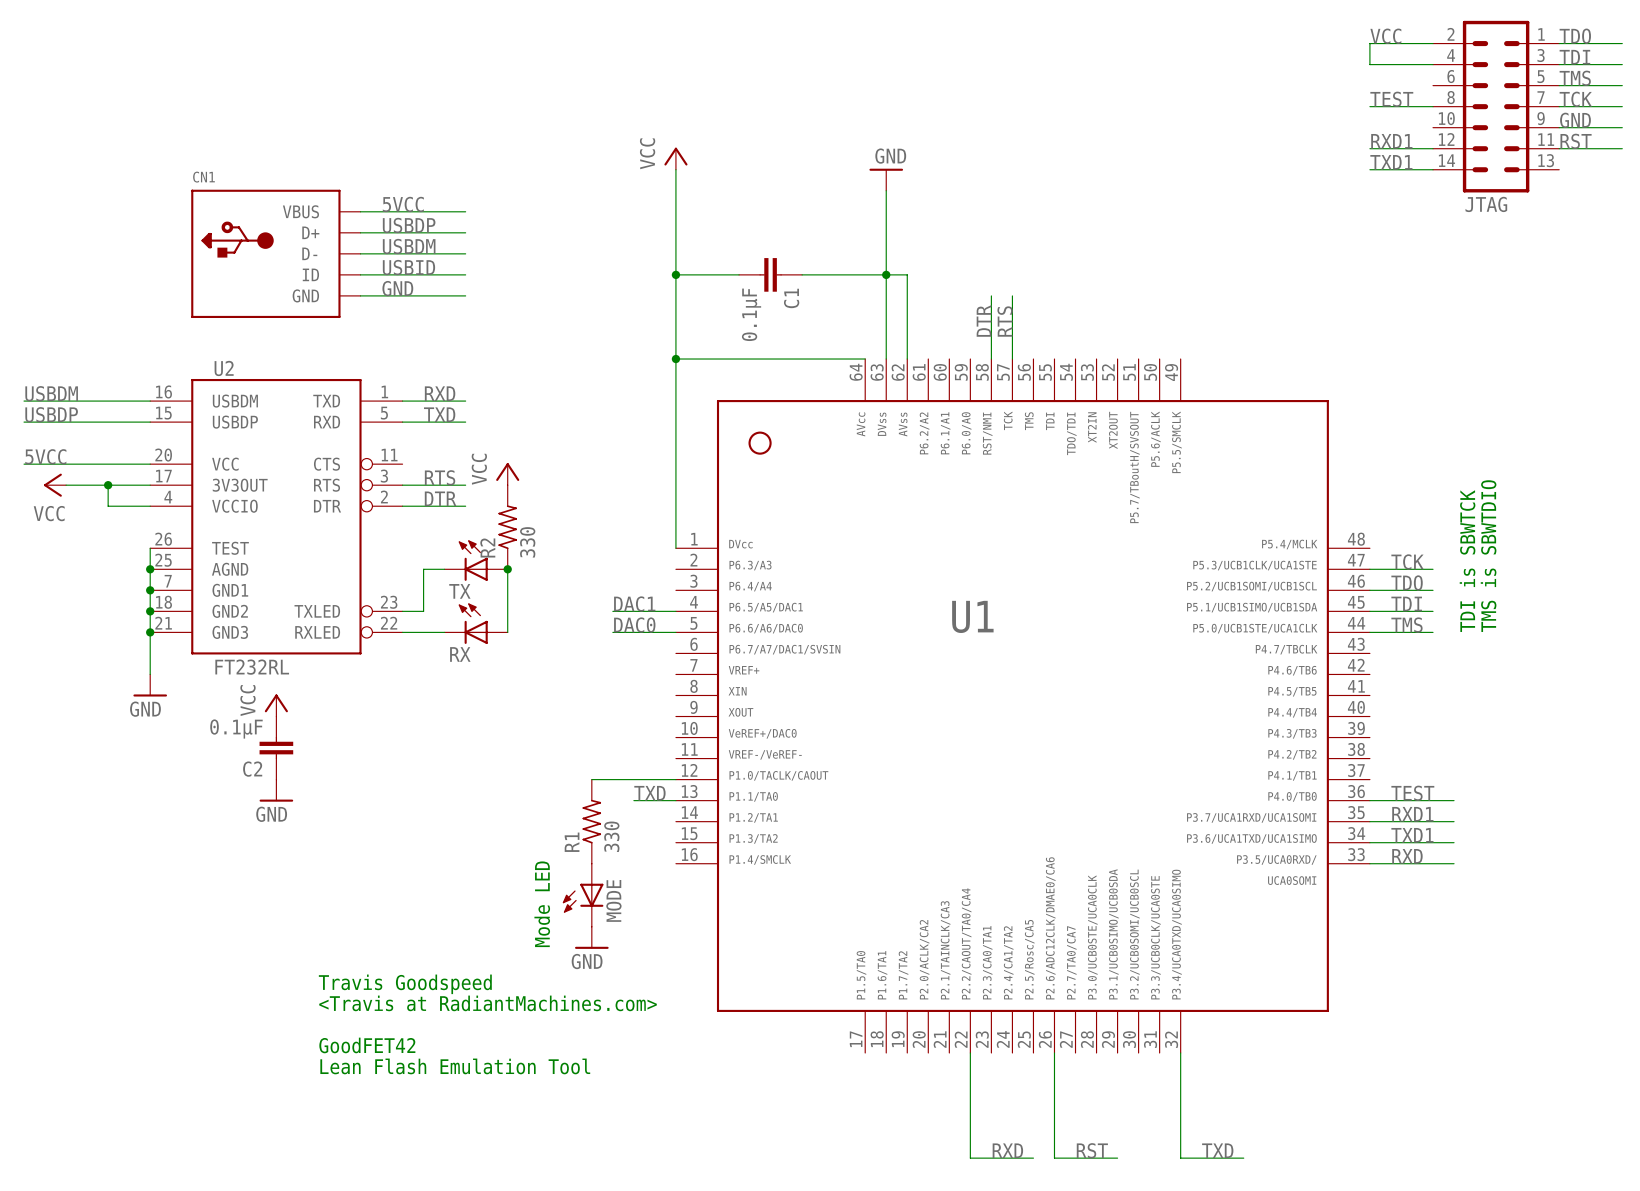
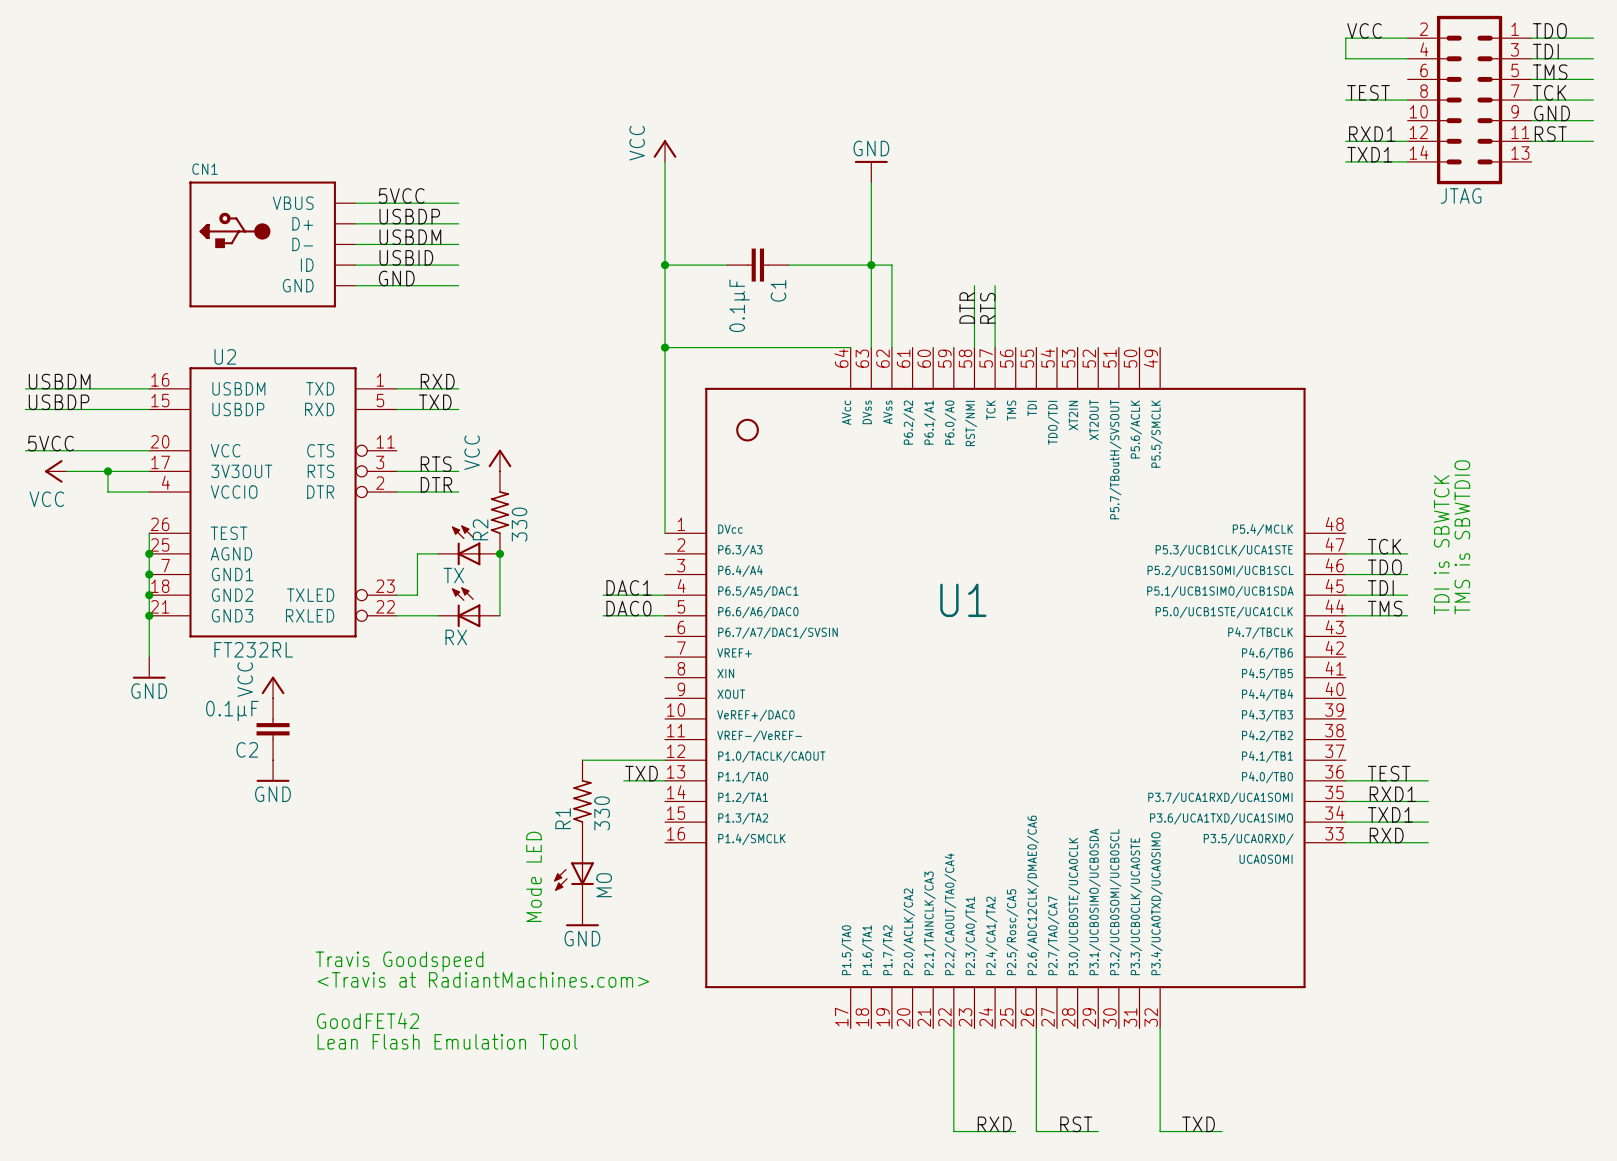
MODE name: MODE (613, 900) -> MO (604, 885)

